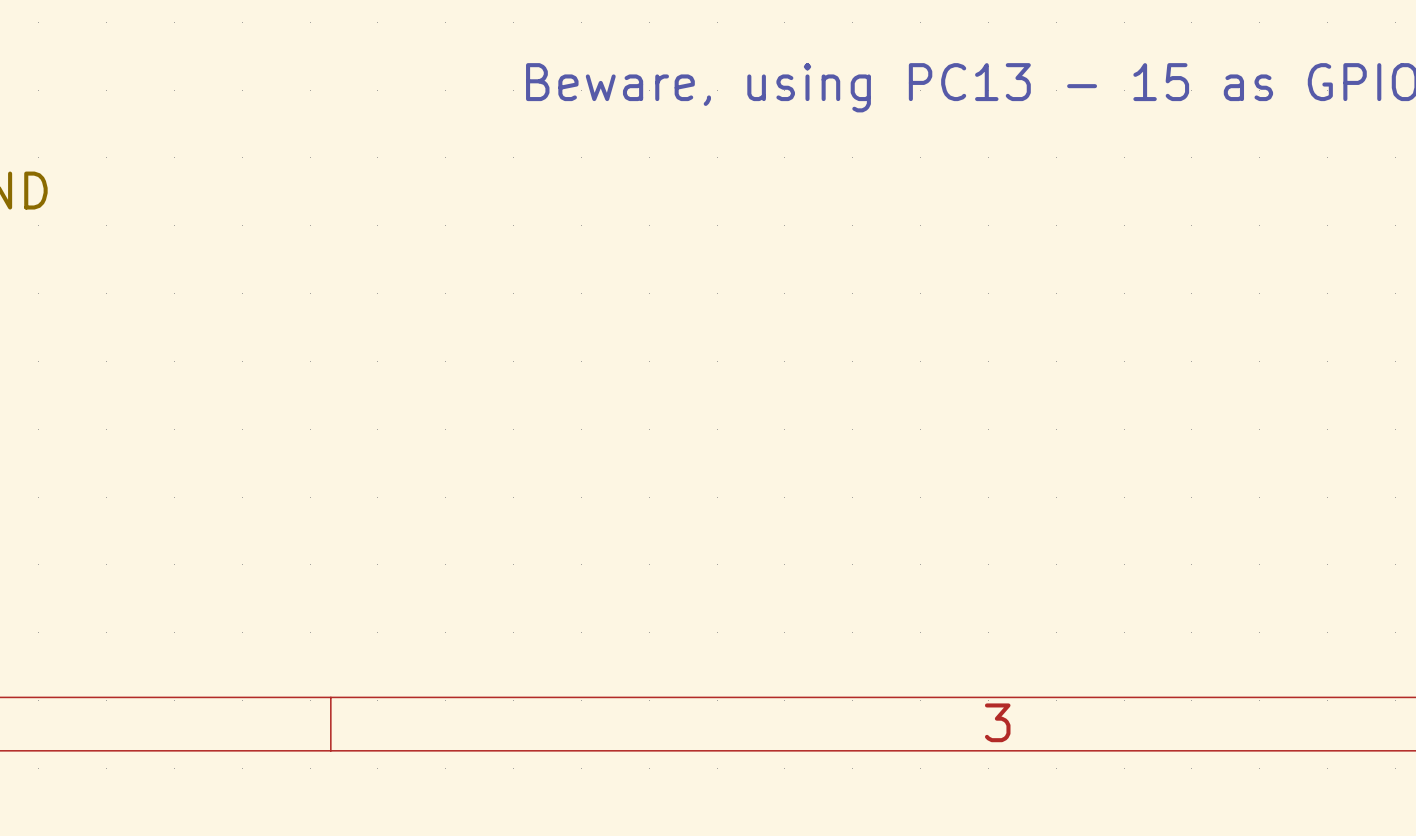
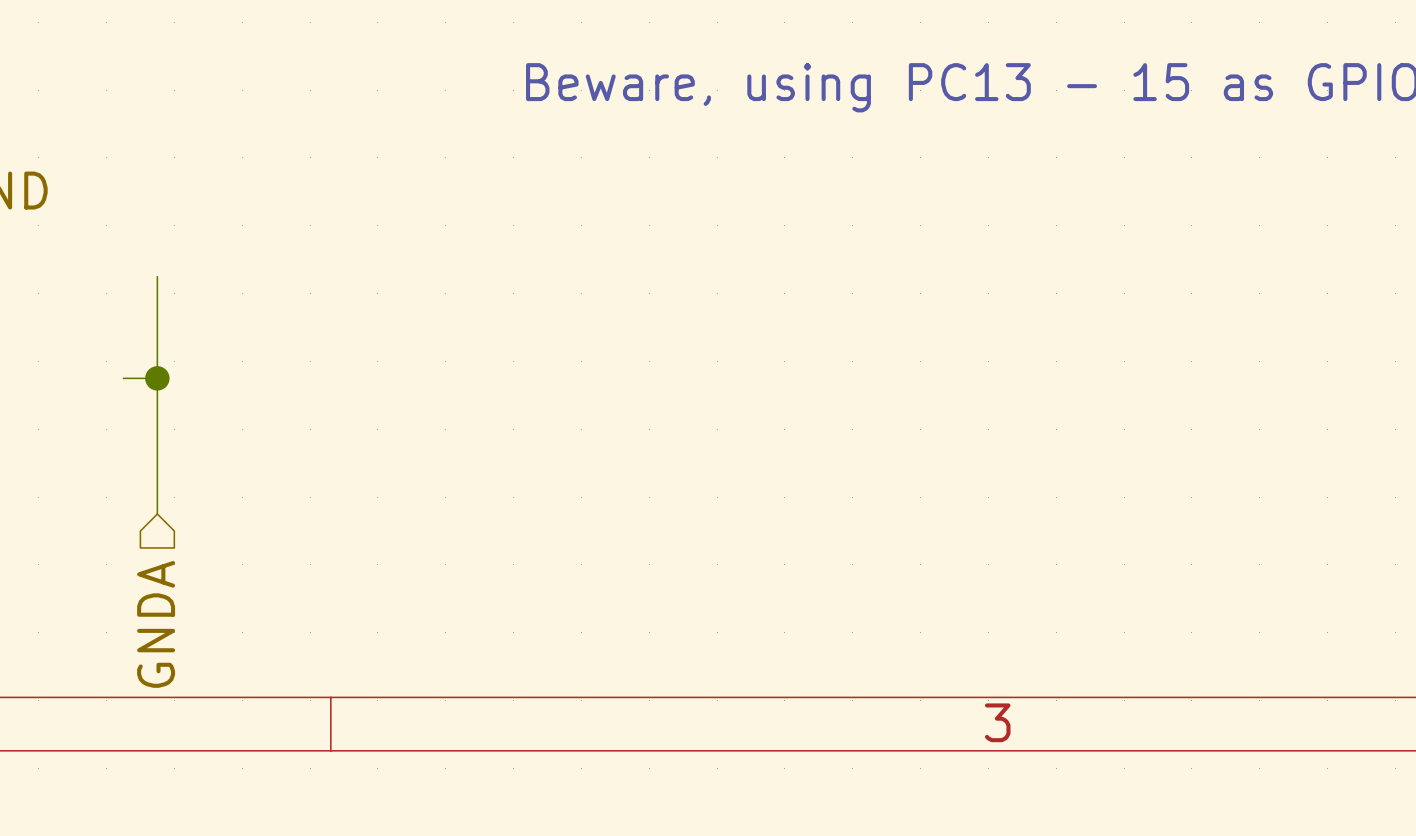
wire: none -> (157, 276) (157, 514)
wire: none -> (123, 378) (157, 378)
junction: none -> (157, 378)
hierarchical label: none -> GNDA (156, 624)

